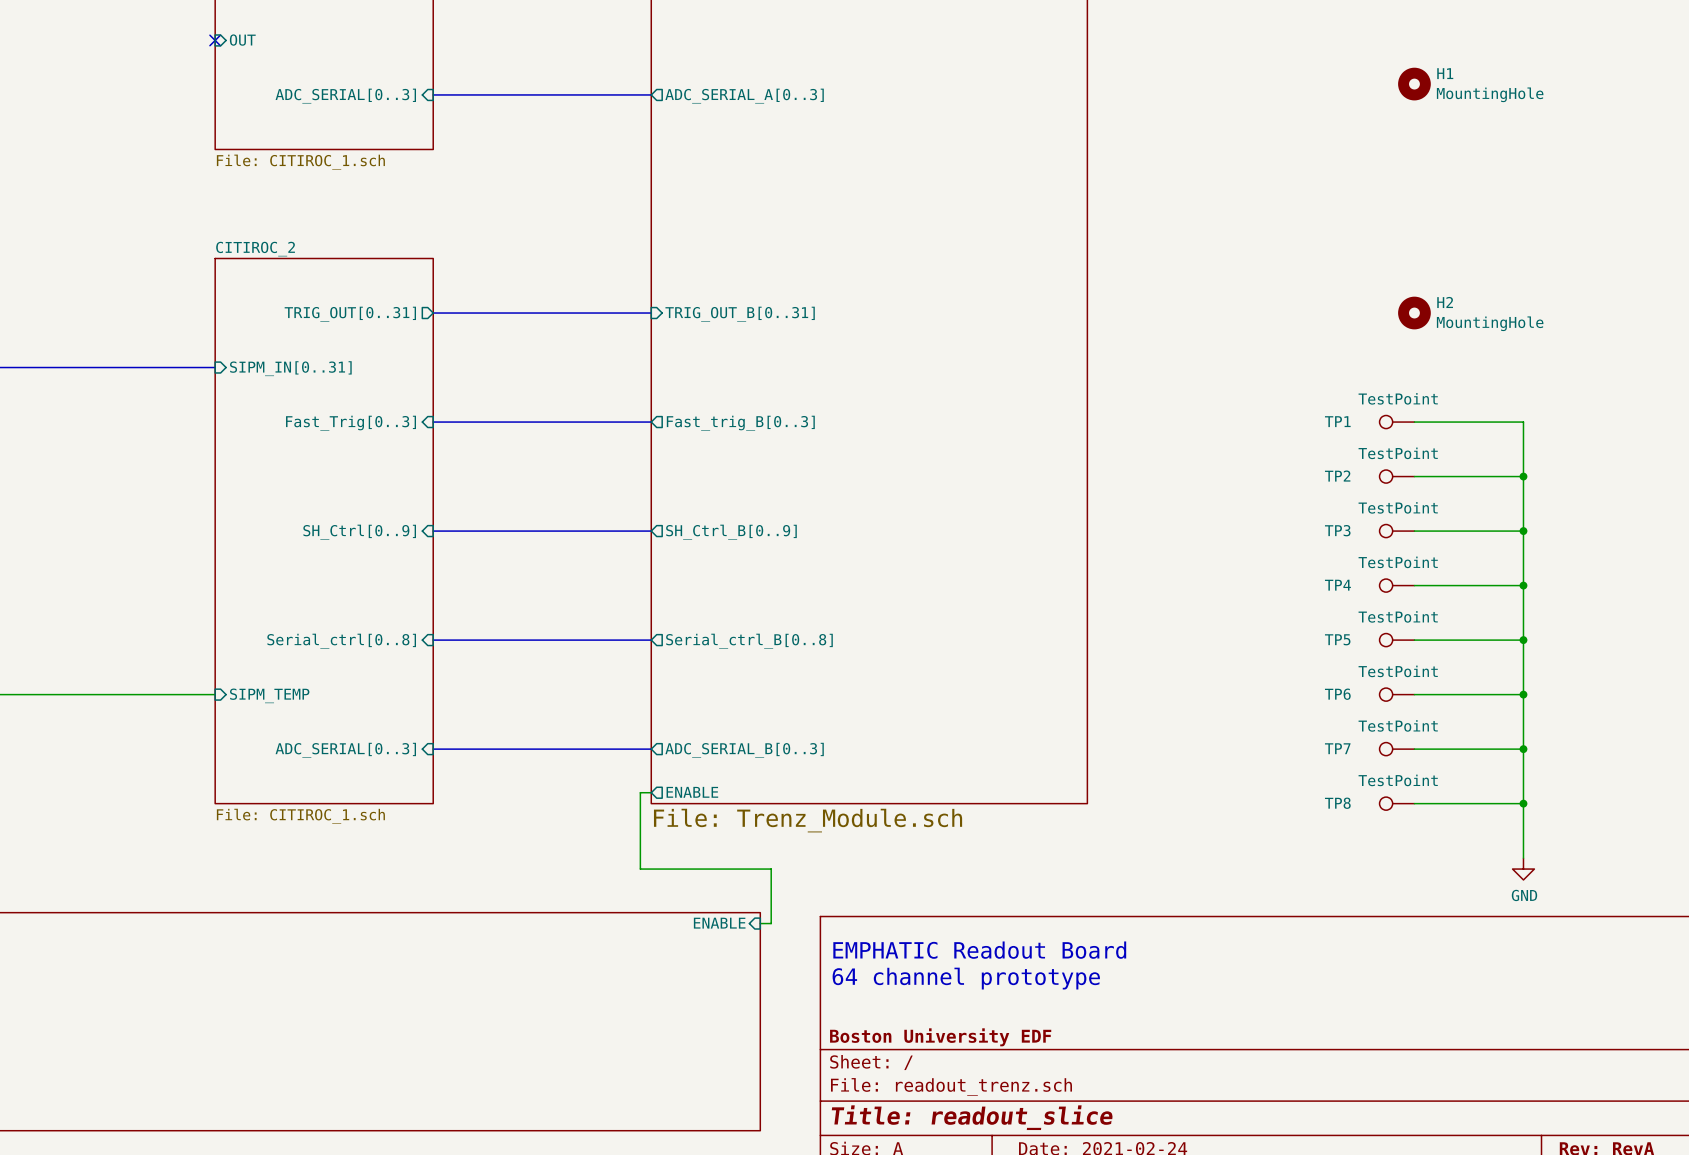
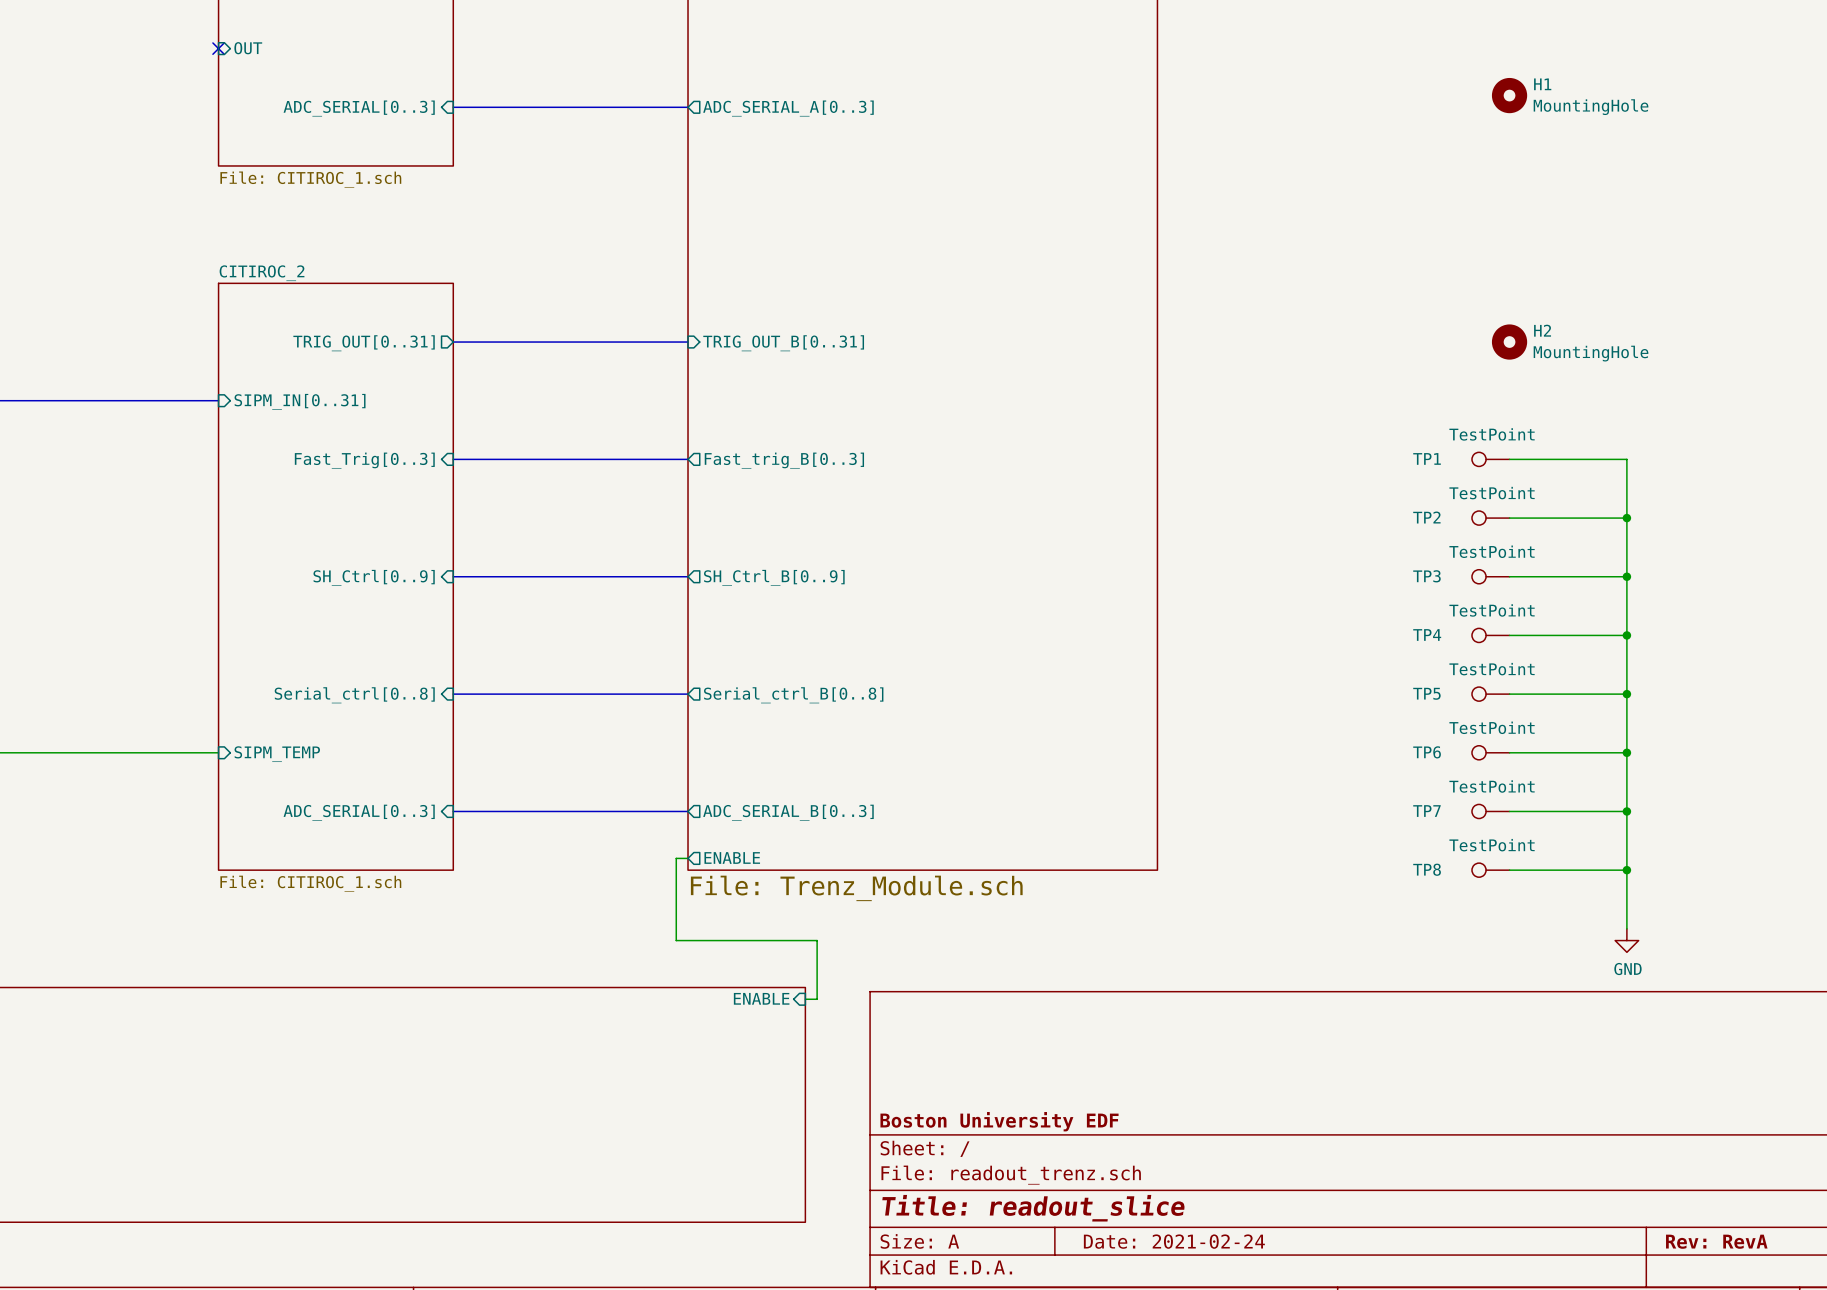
text: EMPHATIC Readout Board (979, 950) -> none
text: 64 channel prototype (966, 978) -> none

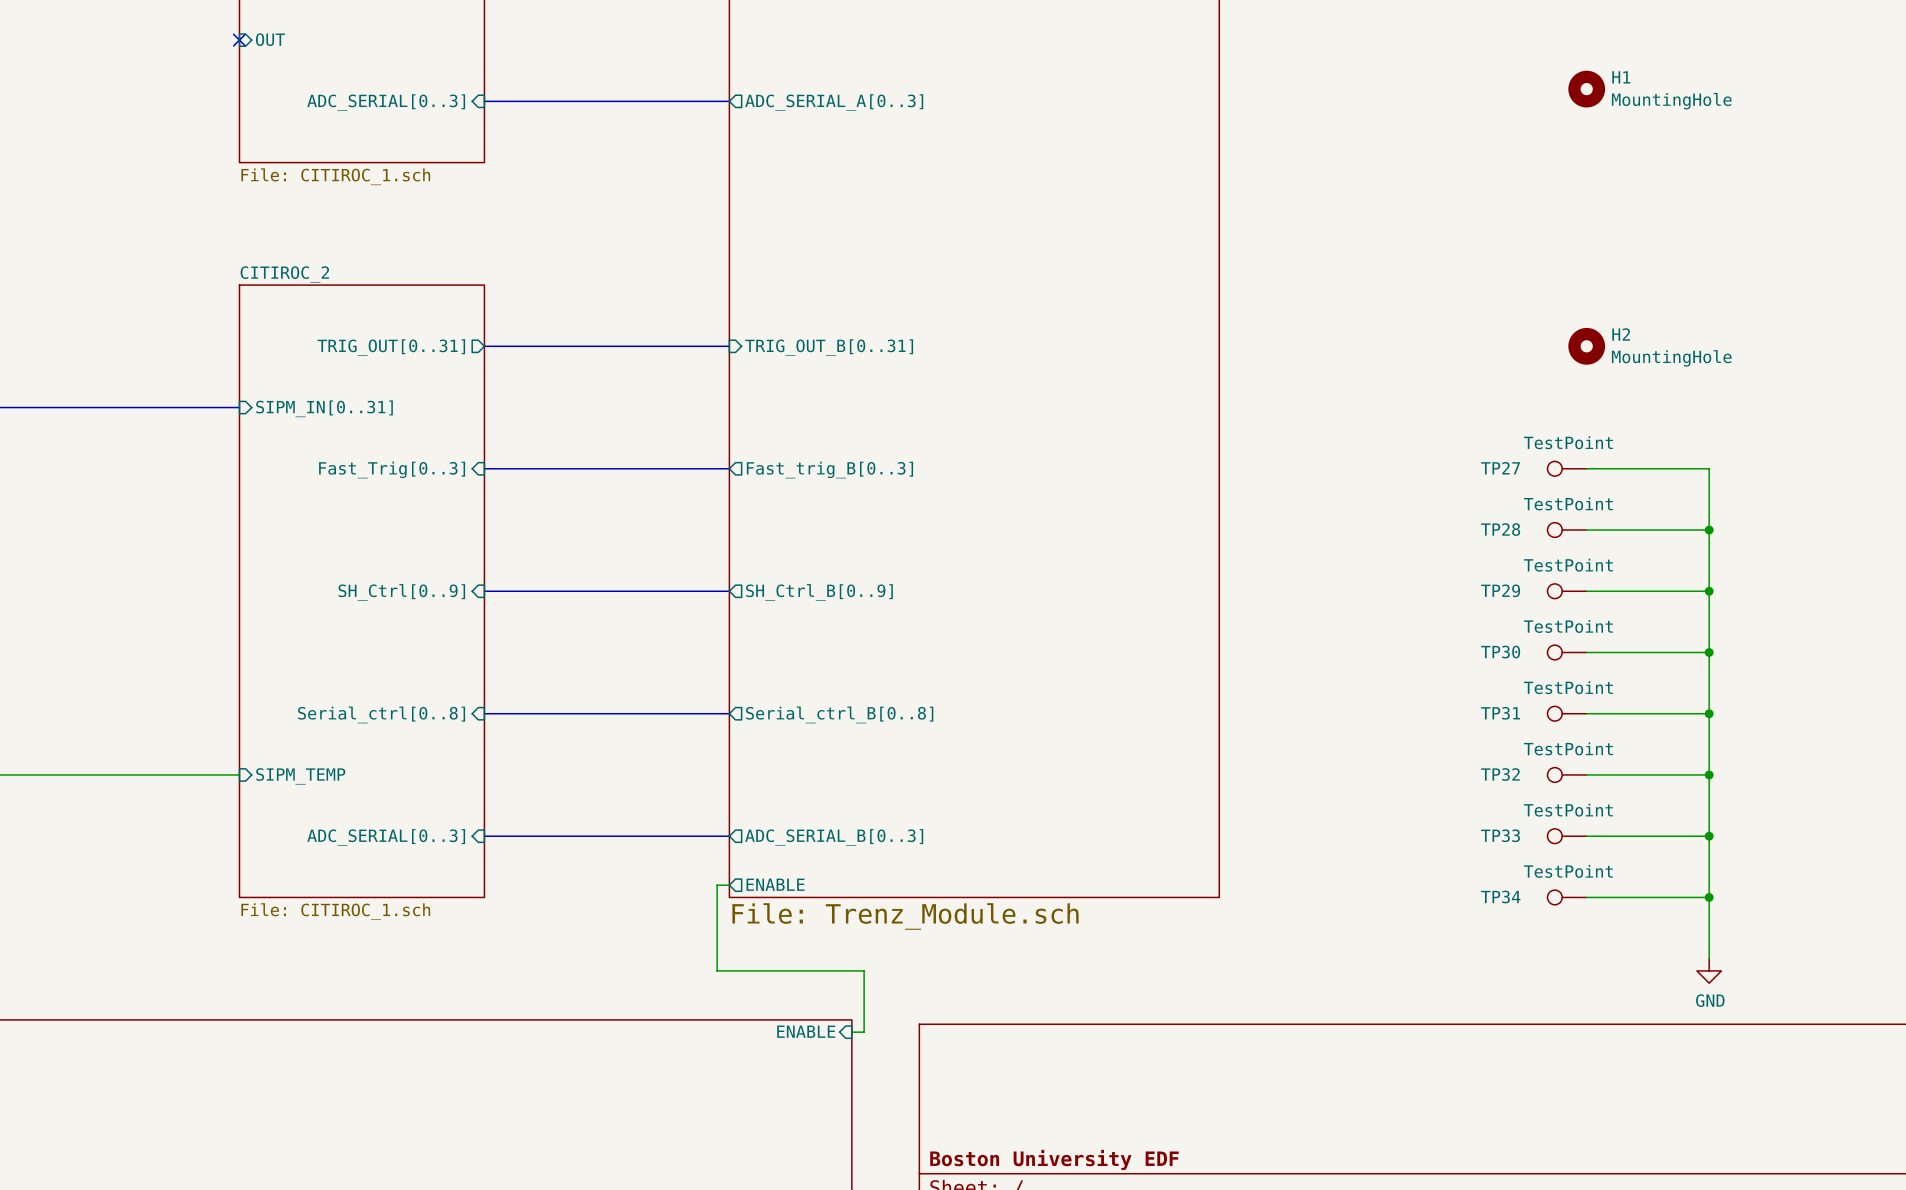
TP1 name: TP1 (1427, 458) -> TP27 (1500, 468)
TP2 name: TP2 (1426, 517) -> TP28 (1500, 529)
TP3 name: TP3 (1426, 576) -> TP29 (1500, 590)
TP4 name: TP4 (1427, 634) -> TP30 (1500, 652)
TP5 name: TP5 (1426, 693) -> TP31 (1500, 713)
TP6 name: TP6 (1427, 752) -> TP32 (1500, 774)
TP7 name: TP7 (1426, 811) -> TP33 (1500, 835)
TP8 name: TP8 (1427, 869) -> TP34 (1500, 896)

